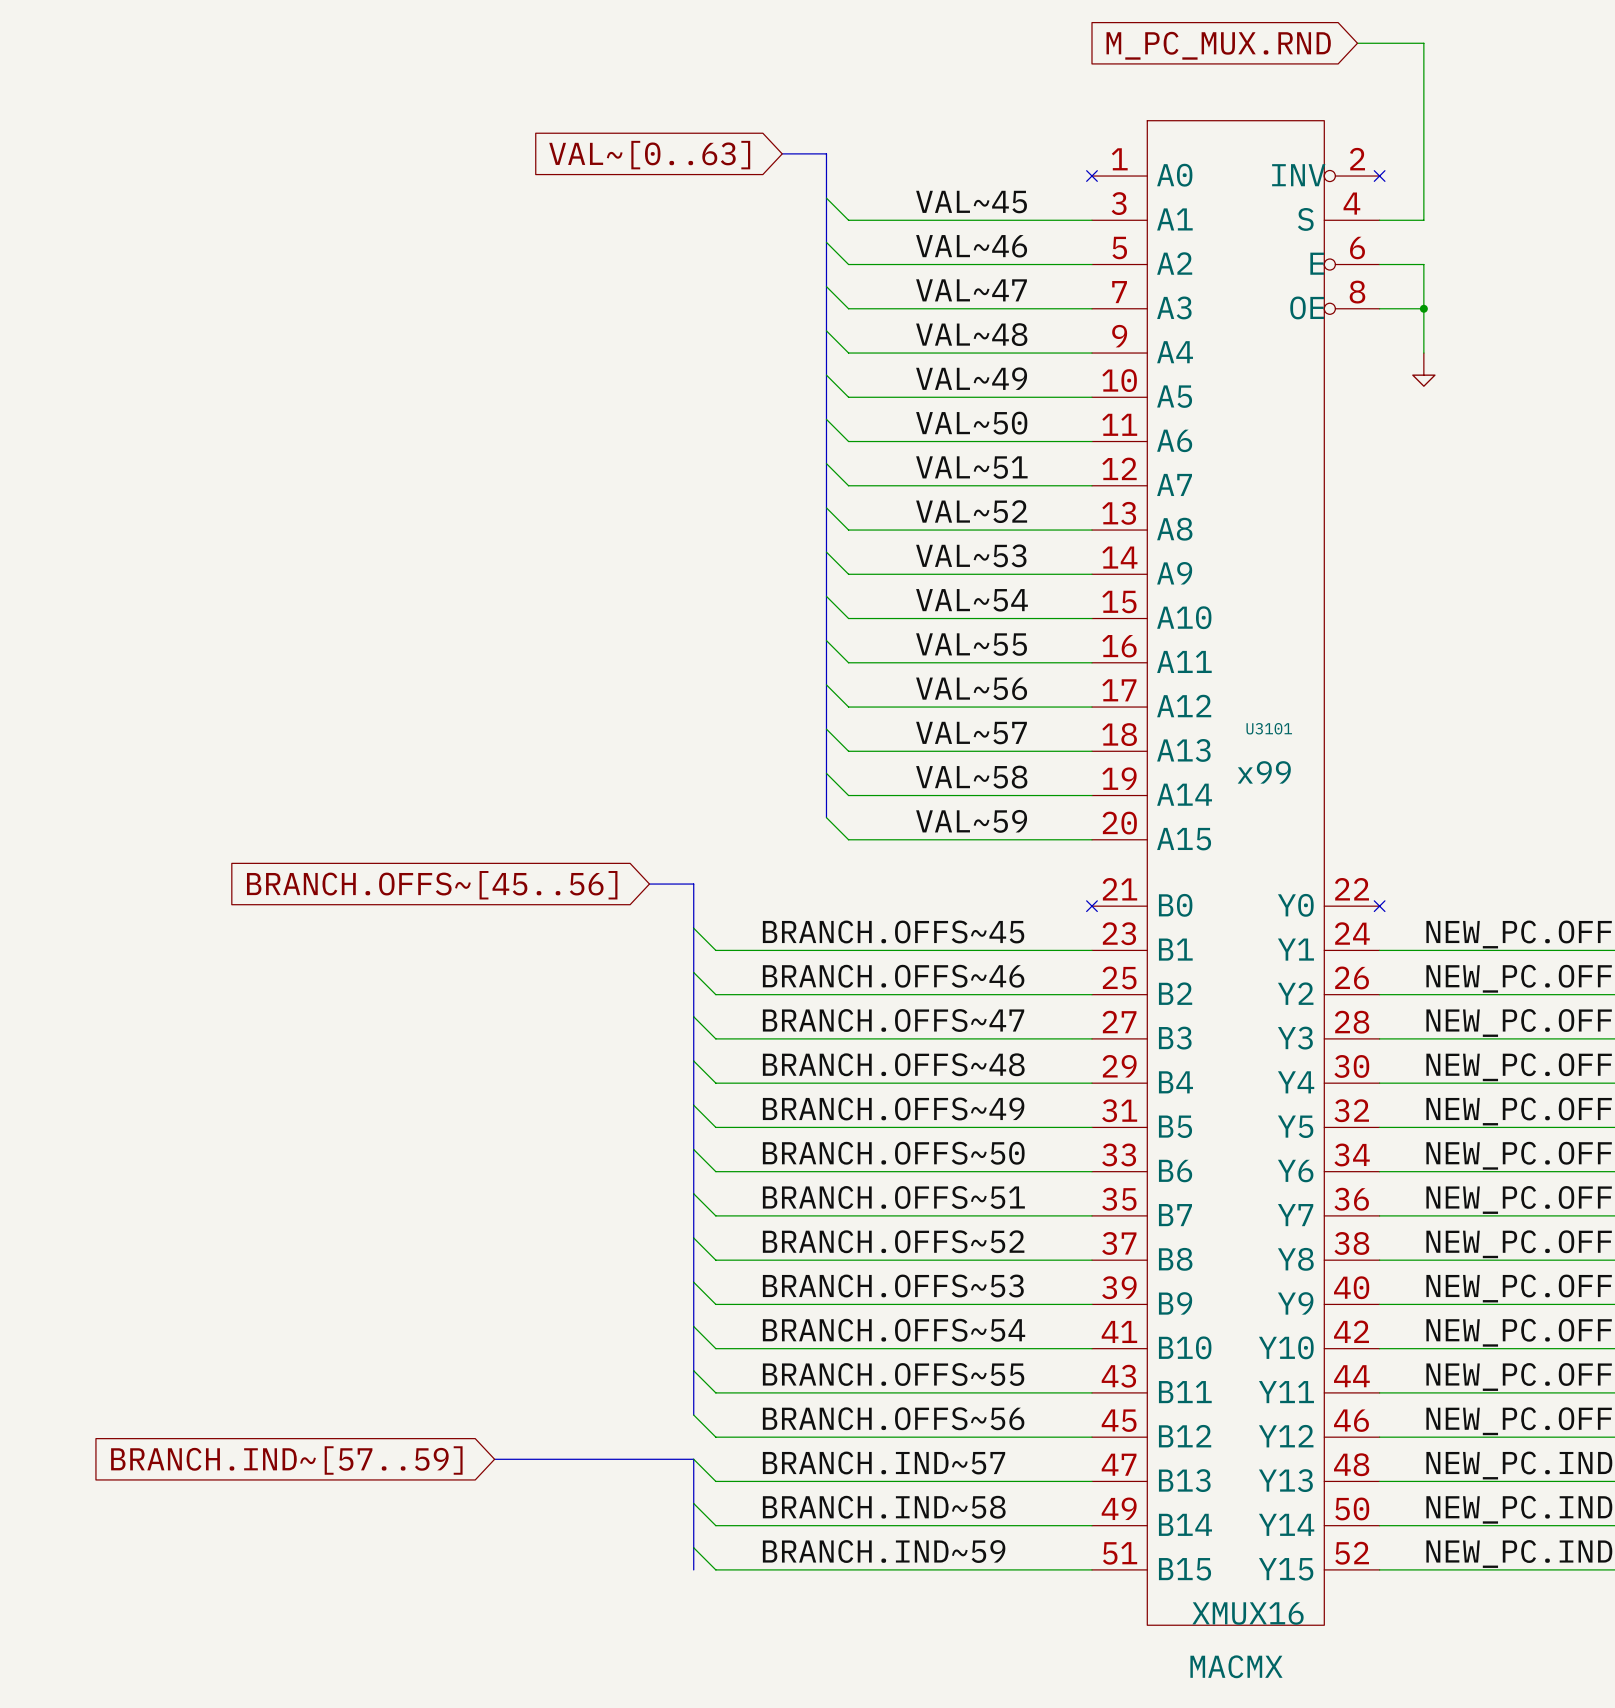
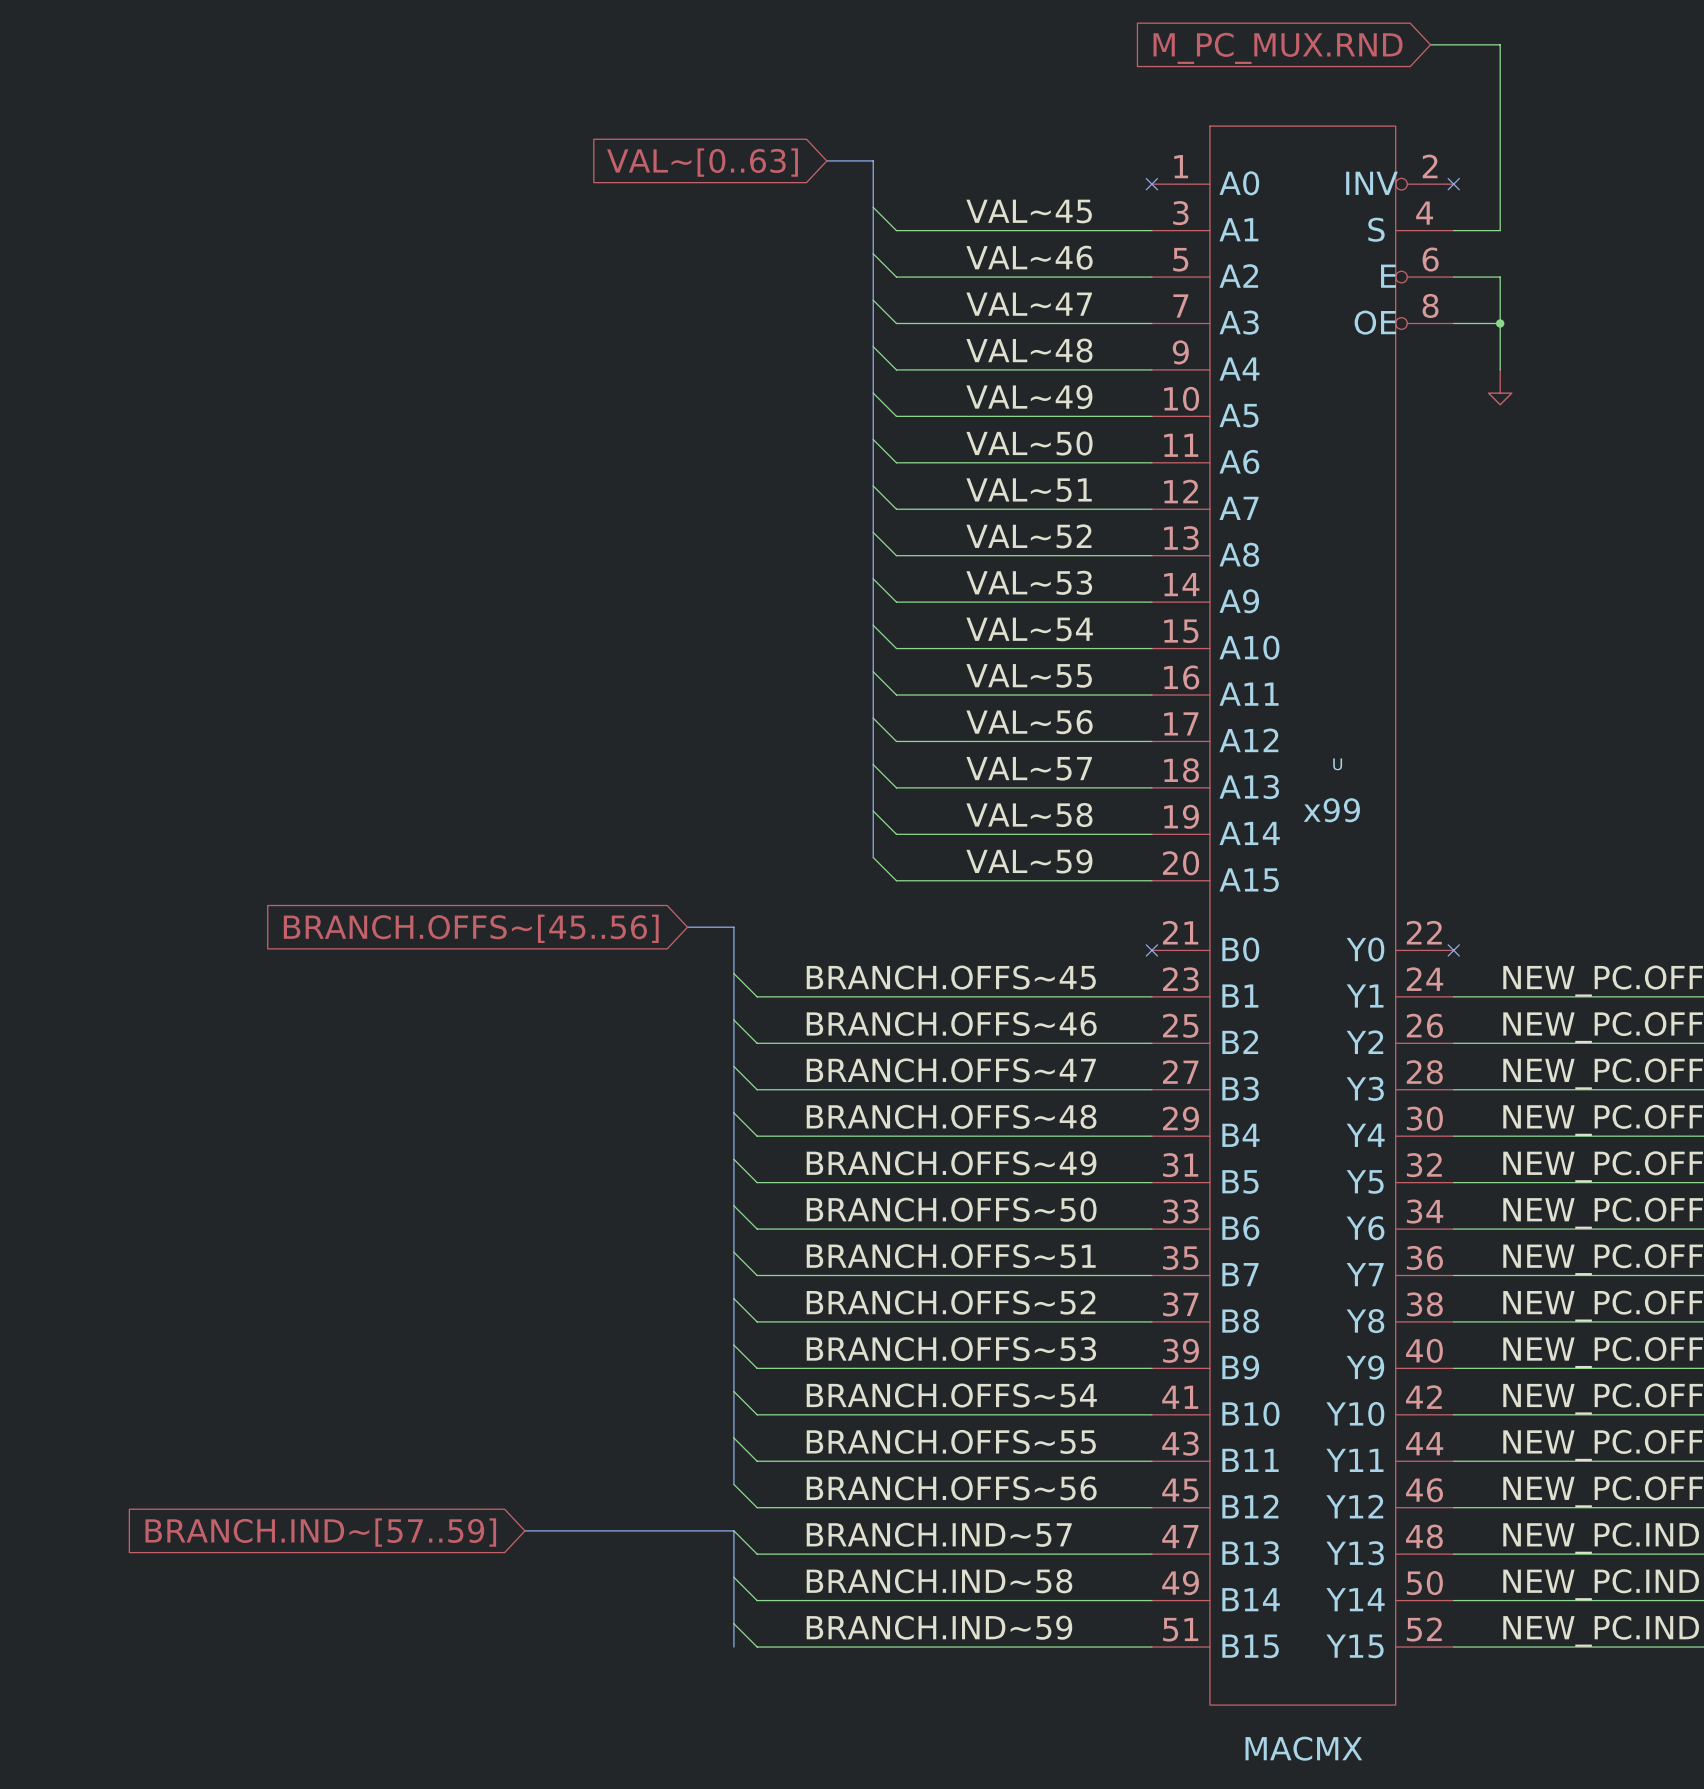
U3101 name: U3101 (1269, 728) -> U (1337, 764)
U3101 value: XMUX16 (1248, 1613) -> none

